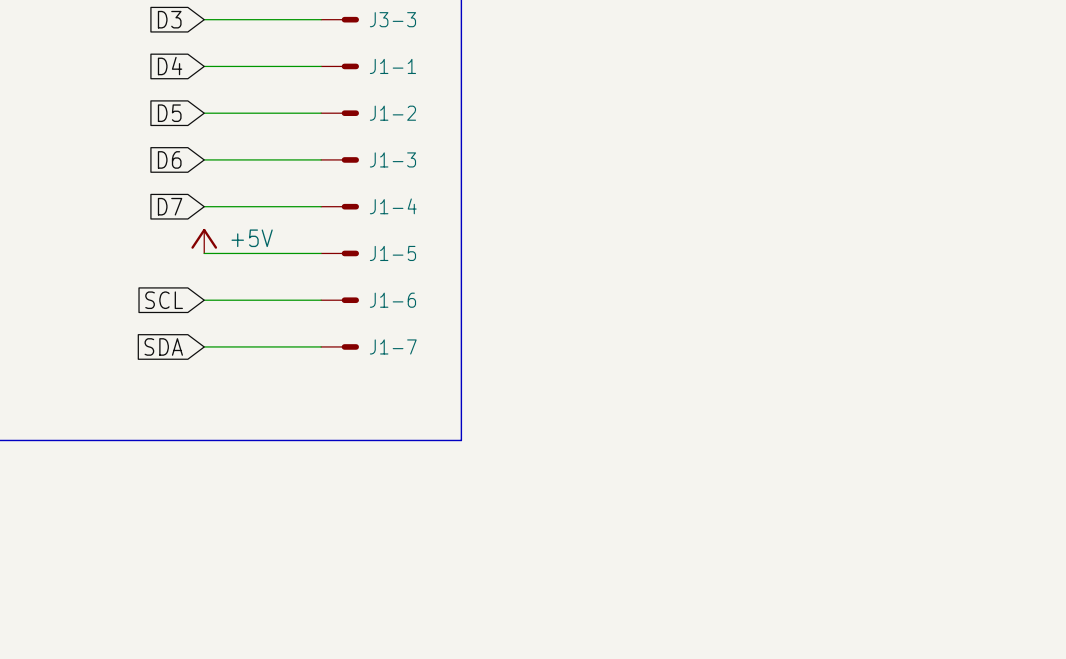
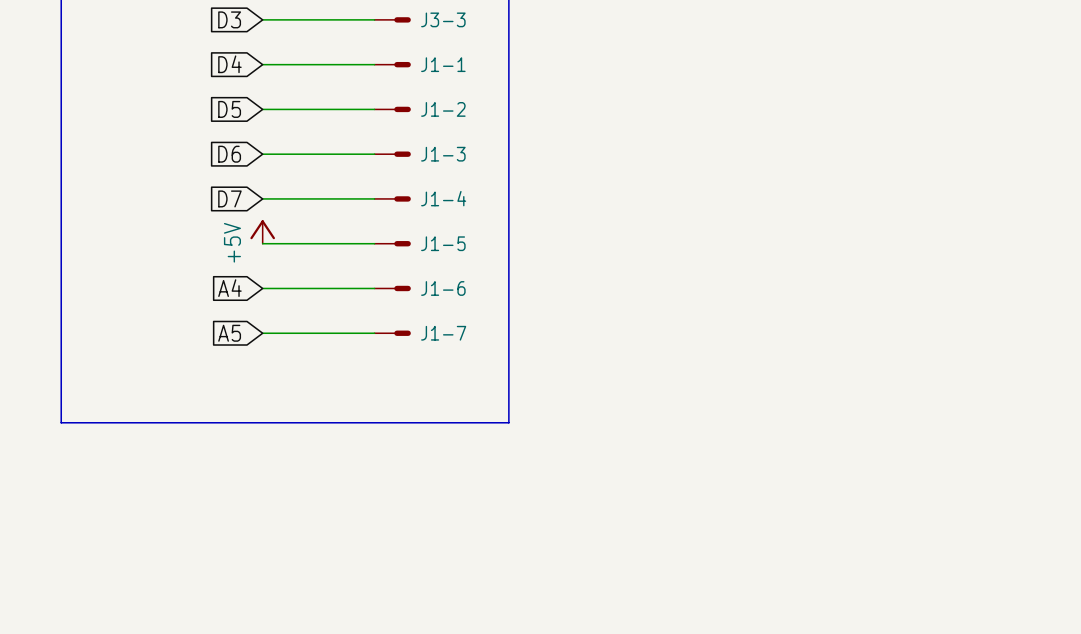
power symbol text rotation: 0° (252, 238) -> 90° counterclockwise (232, 242)
power symbol text position: +5V (252, 238) -> +5V (232, 242)
global label: SCL (164, 300) -> A4 (229, 288)
global label: SDA (163, 346) -> A5 (229, 333)

